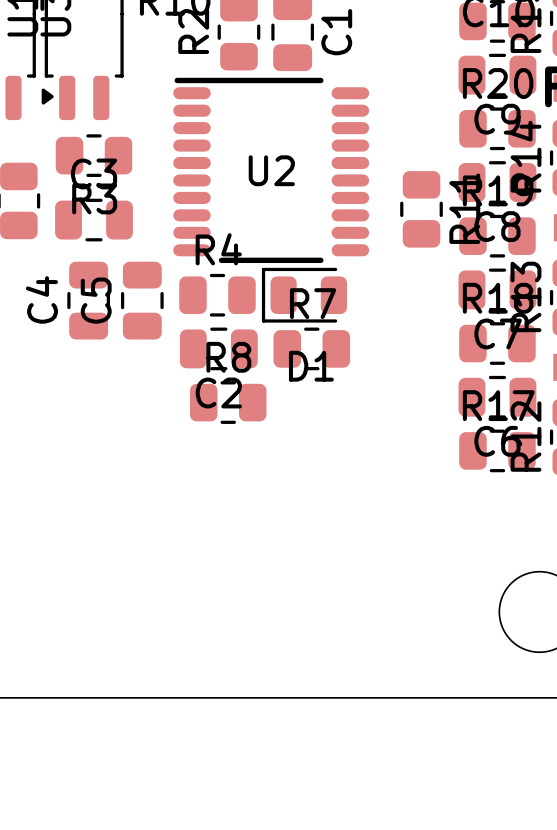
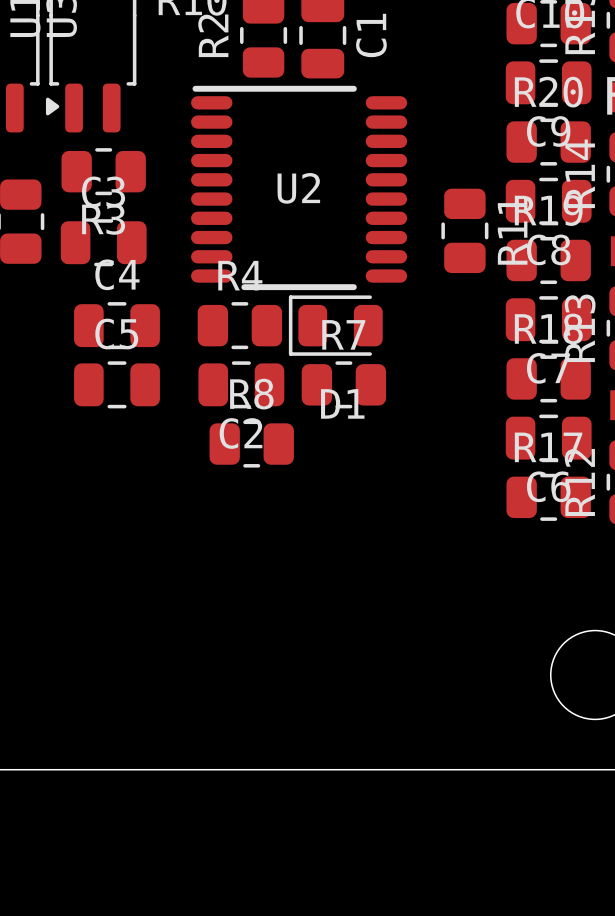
C4 rotation: 0° (88, 300) -> 90° clockwise (117, 325)
C5 rotation: 0° (142, 300) -> 90° clockwise (117, 384)
C5 position: (142, 300) -> (117, 384)

